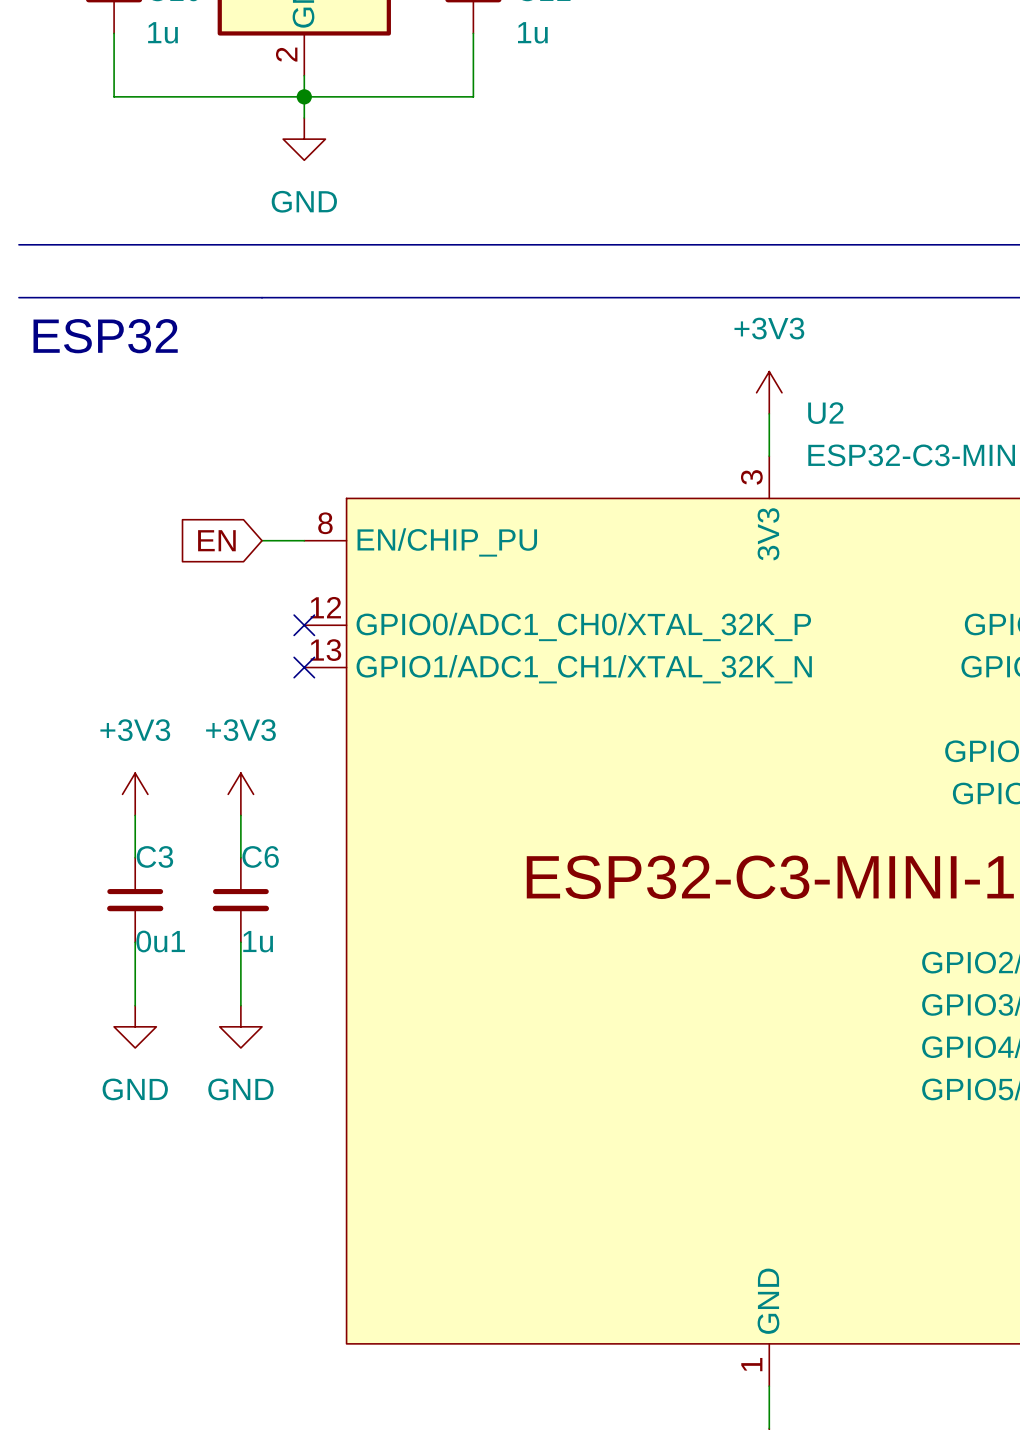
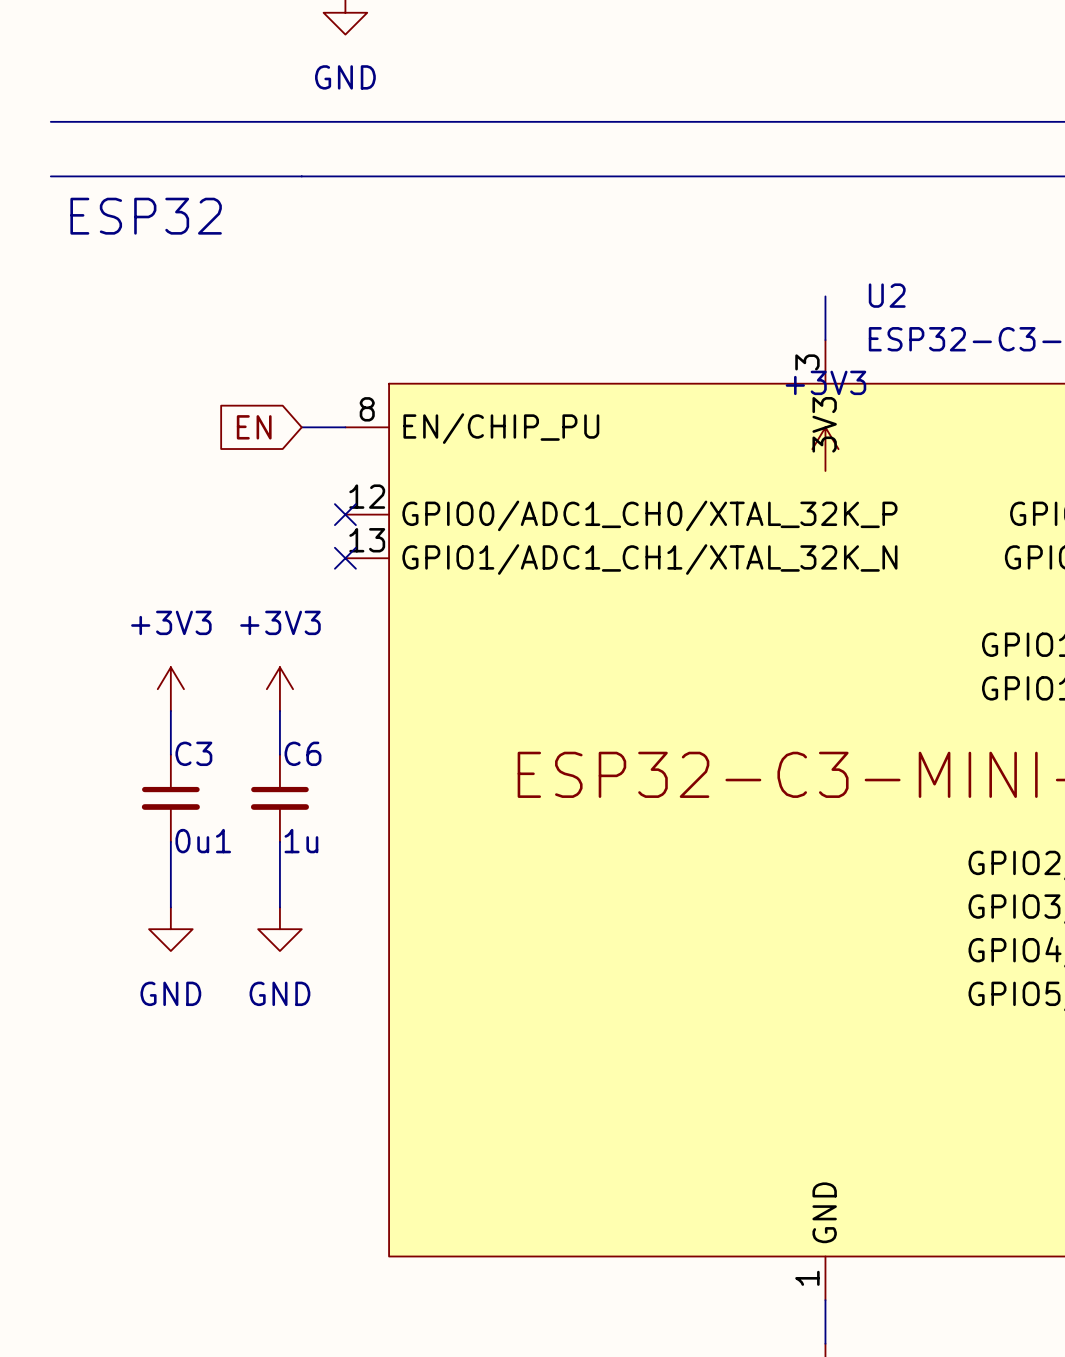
power symbol position: +3V3 (769, 392) -> +3V3 (825, 449)

